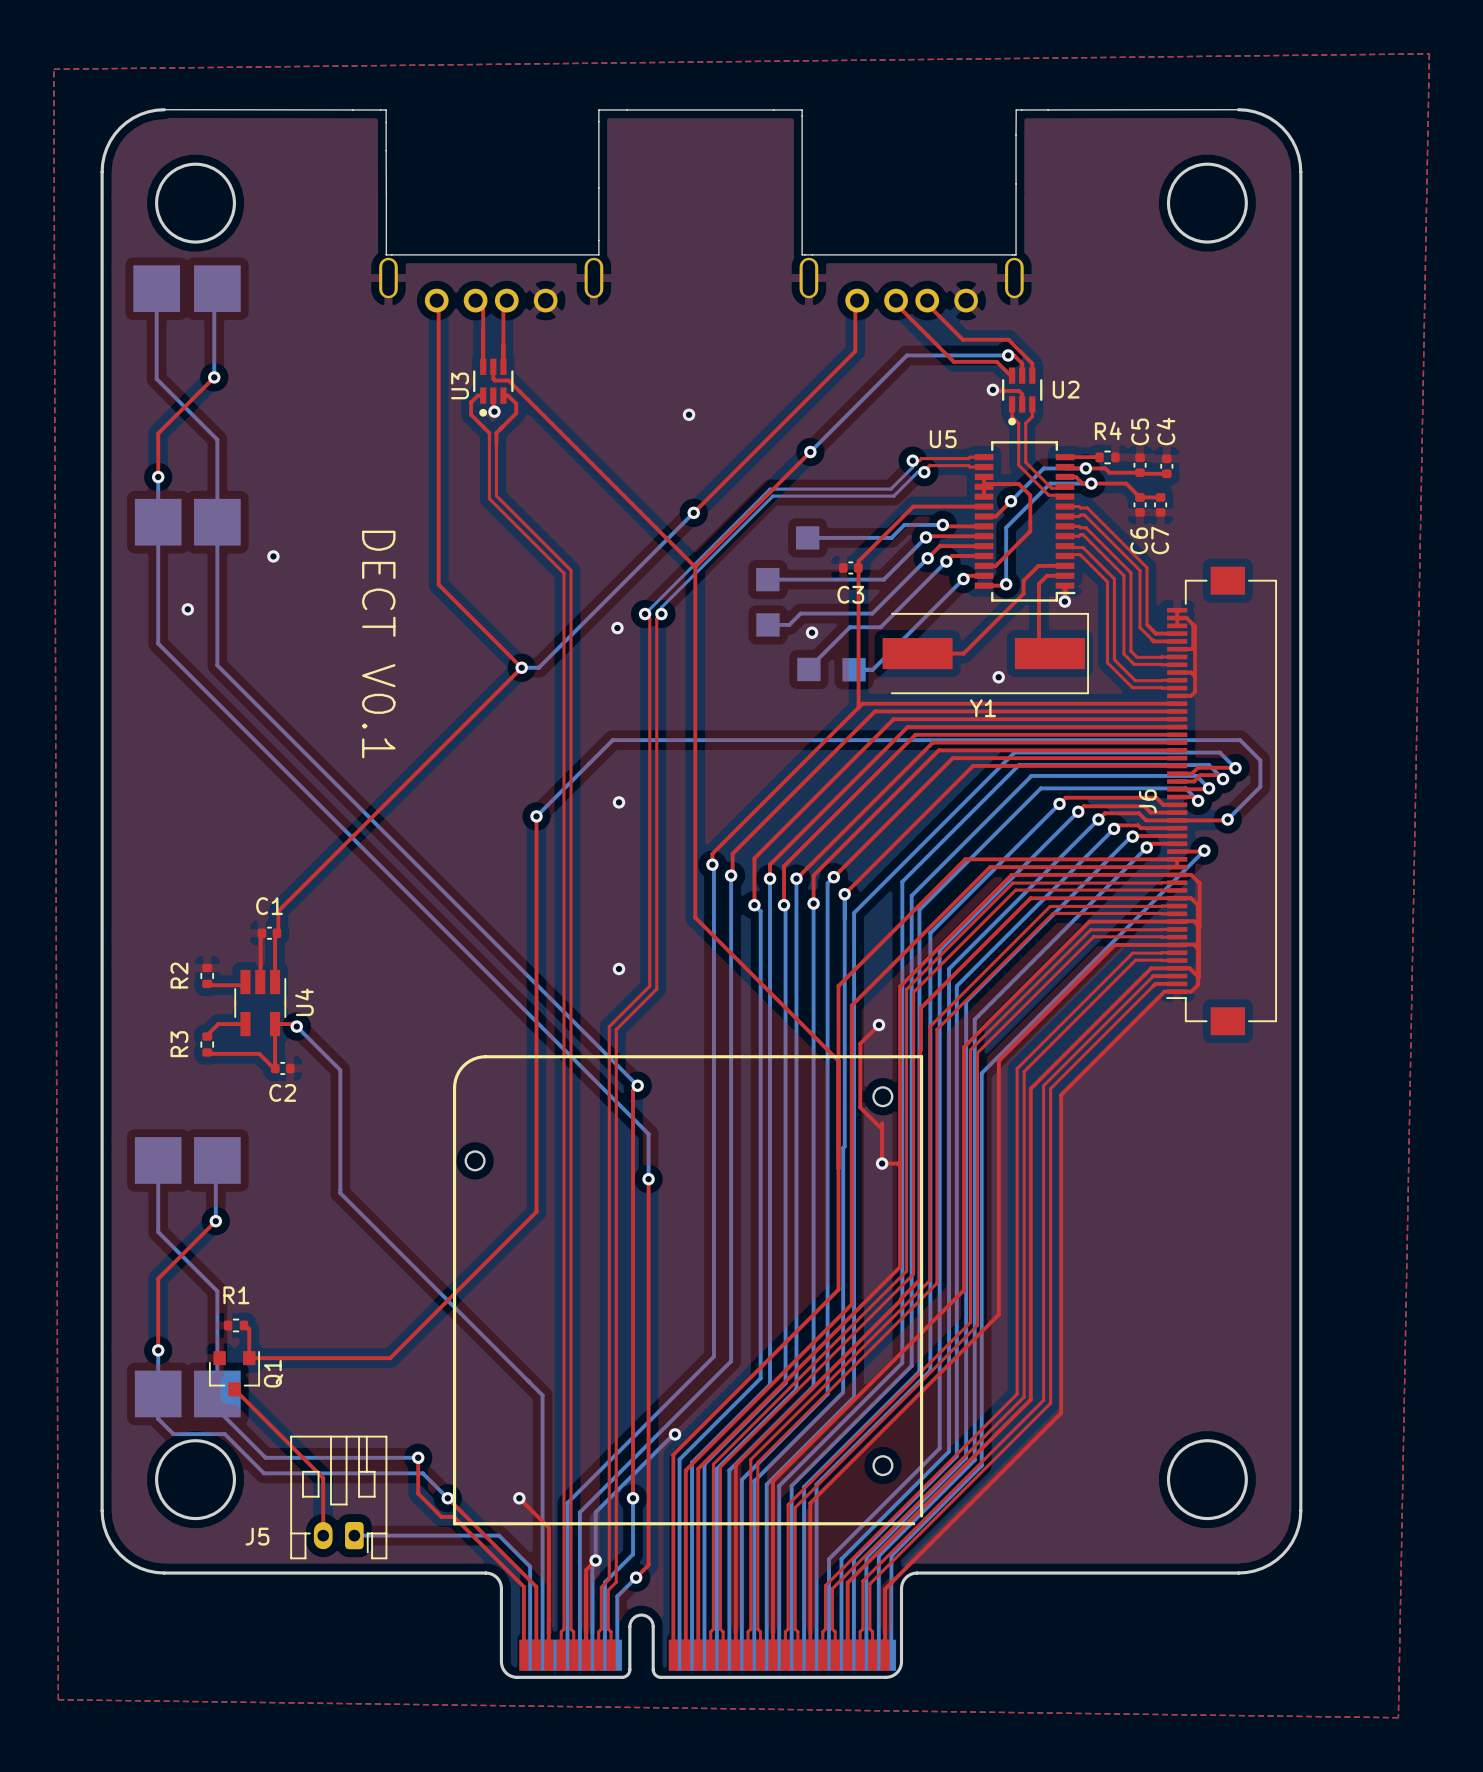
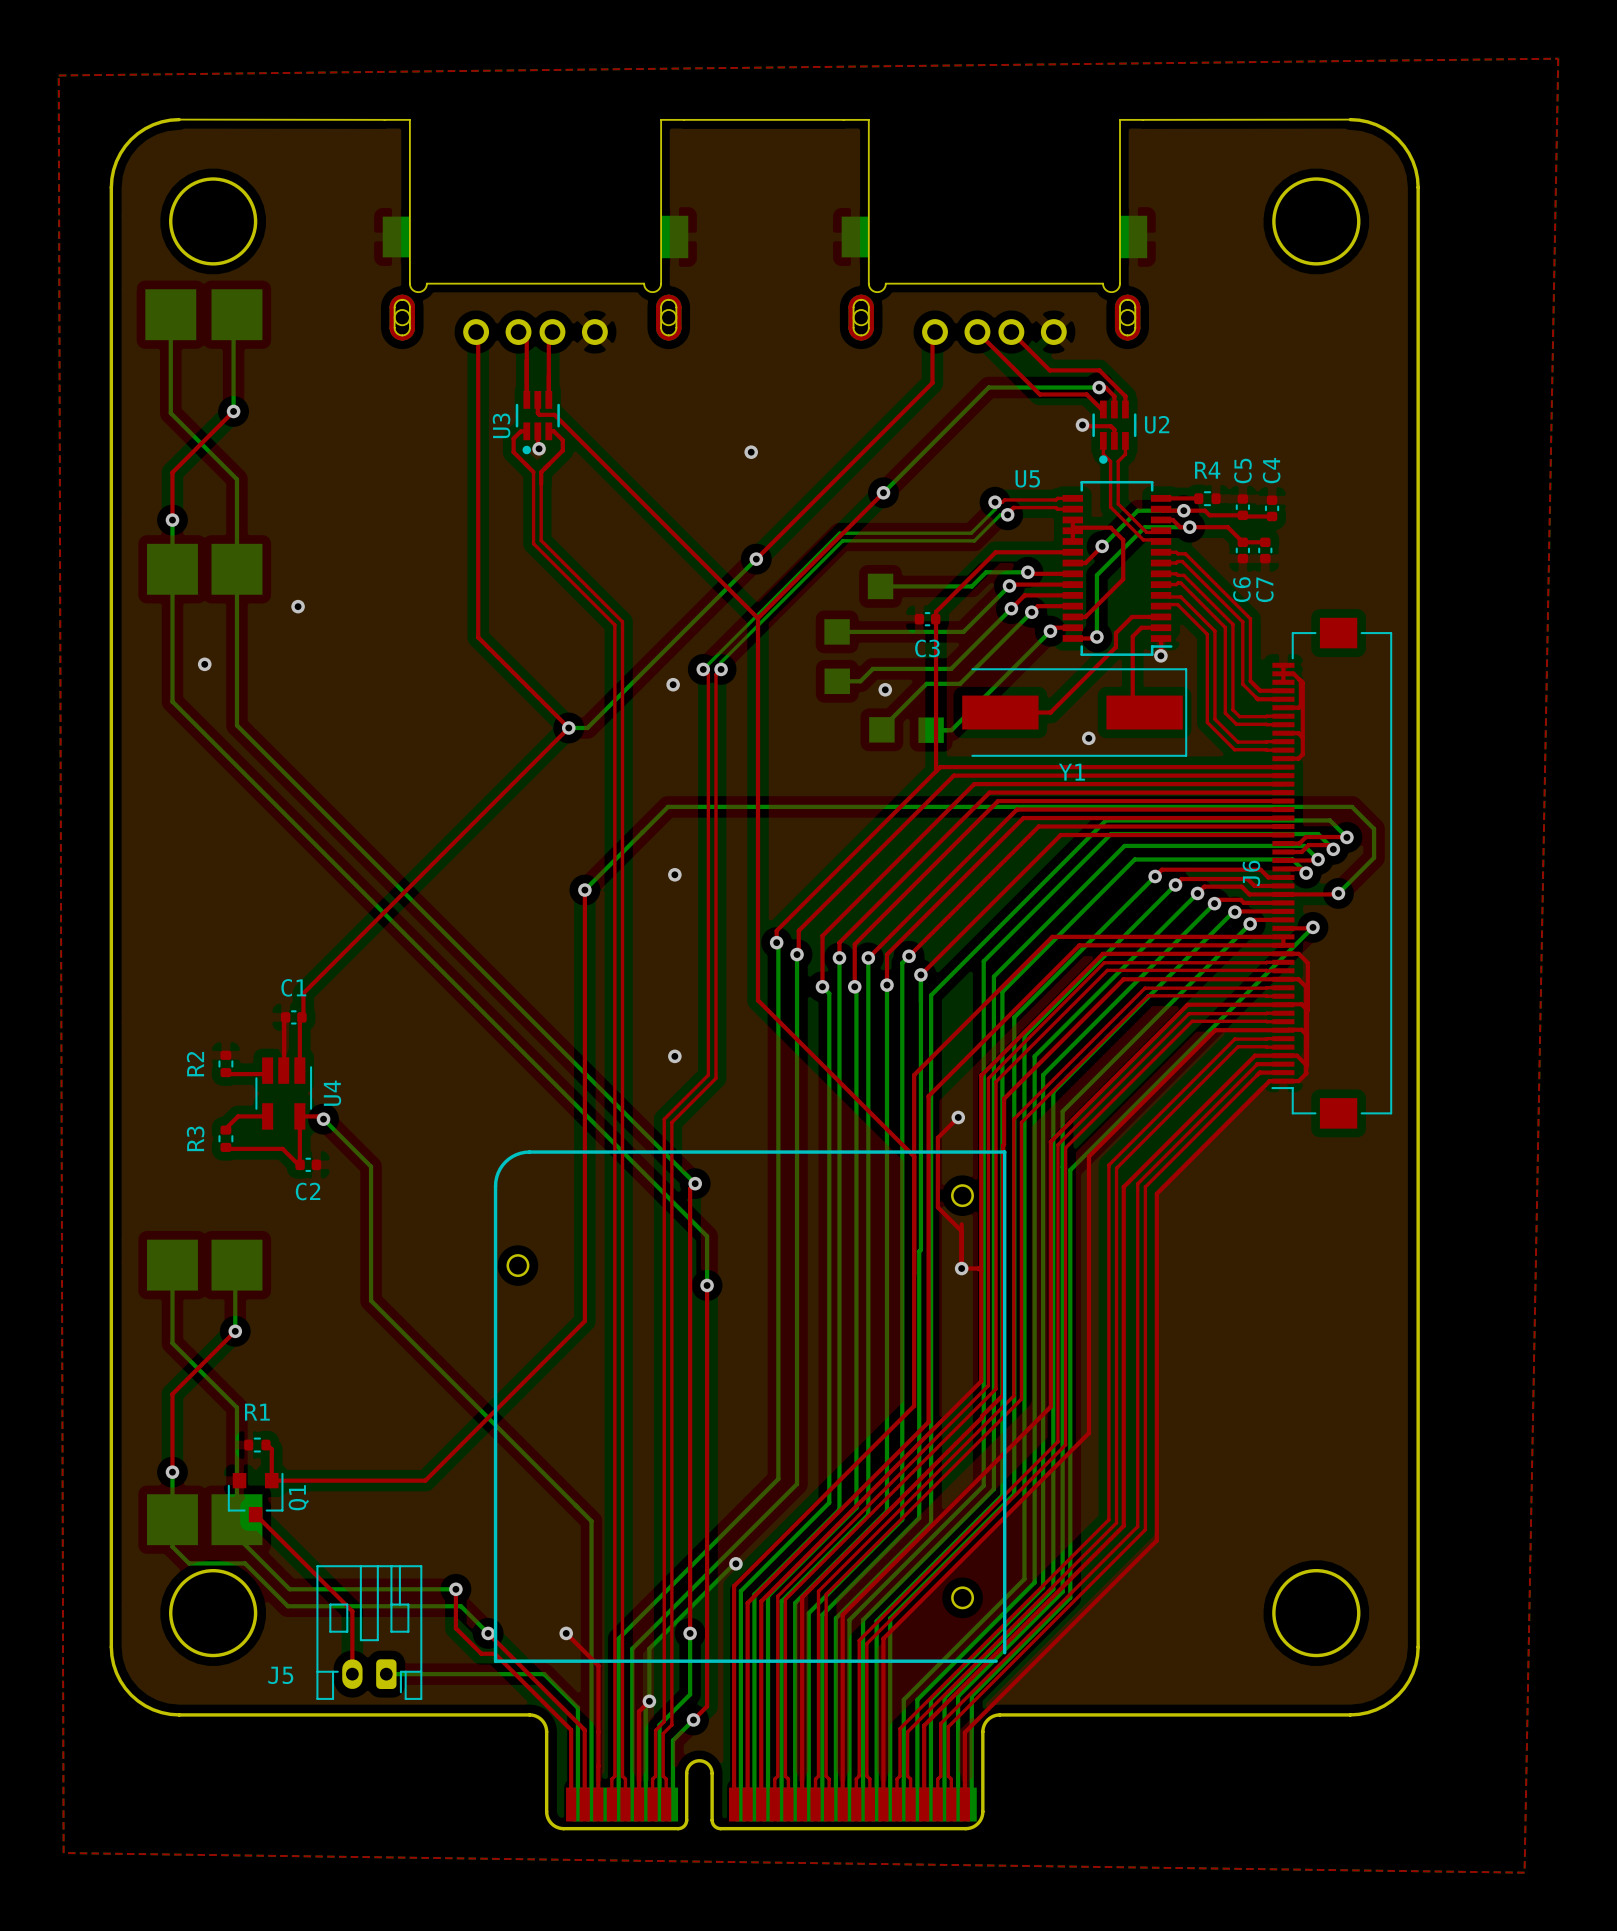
board edge: (352, 109) (386, 109) (386, 254) (598, 254) (598, 109) (627, 109) -> none
board edge: (773, 109) (802, 109) (802, 254) (1016, 254) (1016, 109) (1048, 109) -> none
part: none -> (535, 232)
part: none -> (994, 232)
part: (491, 285) -> none
part: (911, 285) -> none
text: DECT V0.1 (378, 644) -> none

